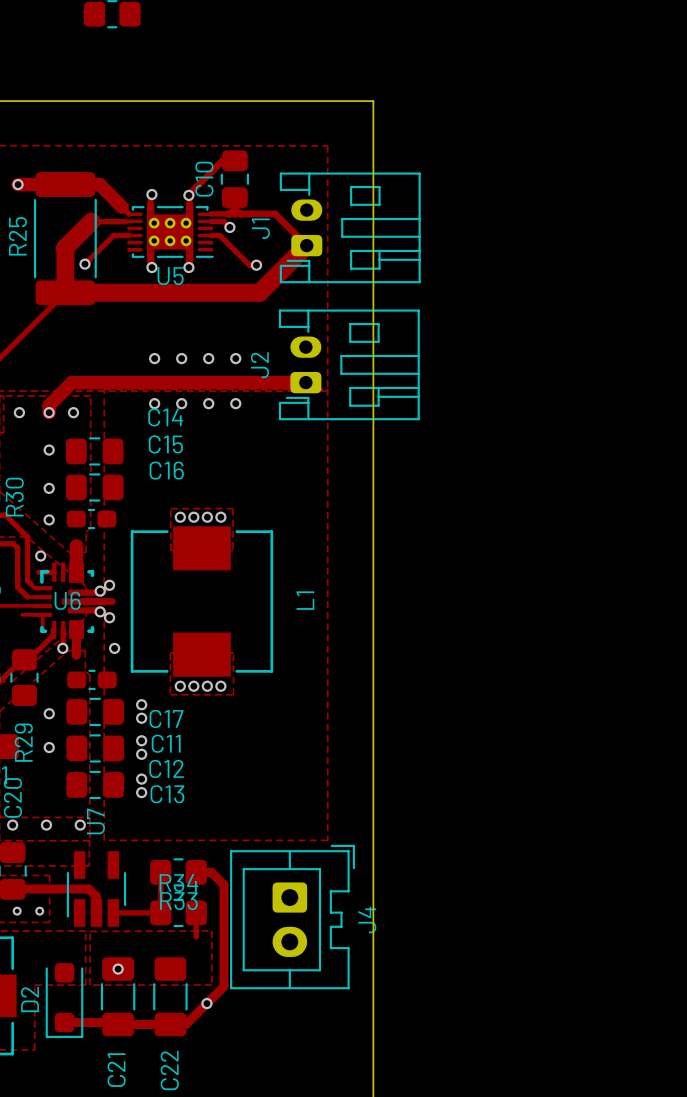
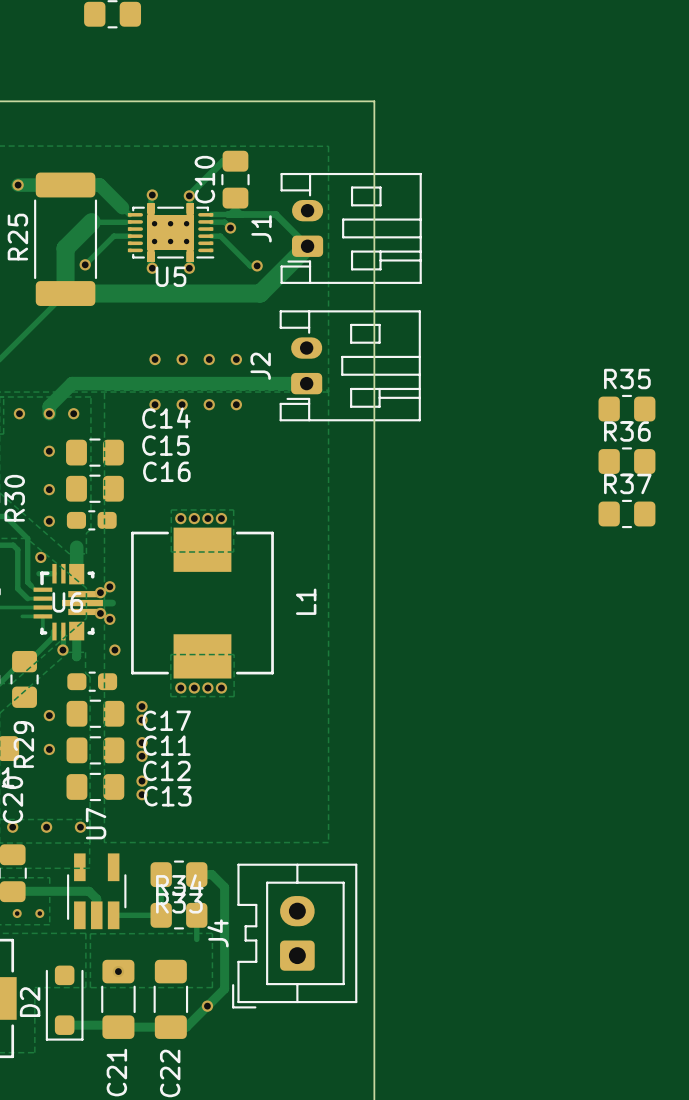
R35: none -> (626, 409)
R36: none -> (626, 461)
R37: none -> (626, 513)
J4 rotation: 0° (292, 917) -> 180° (294, 936)

